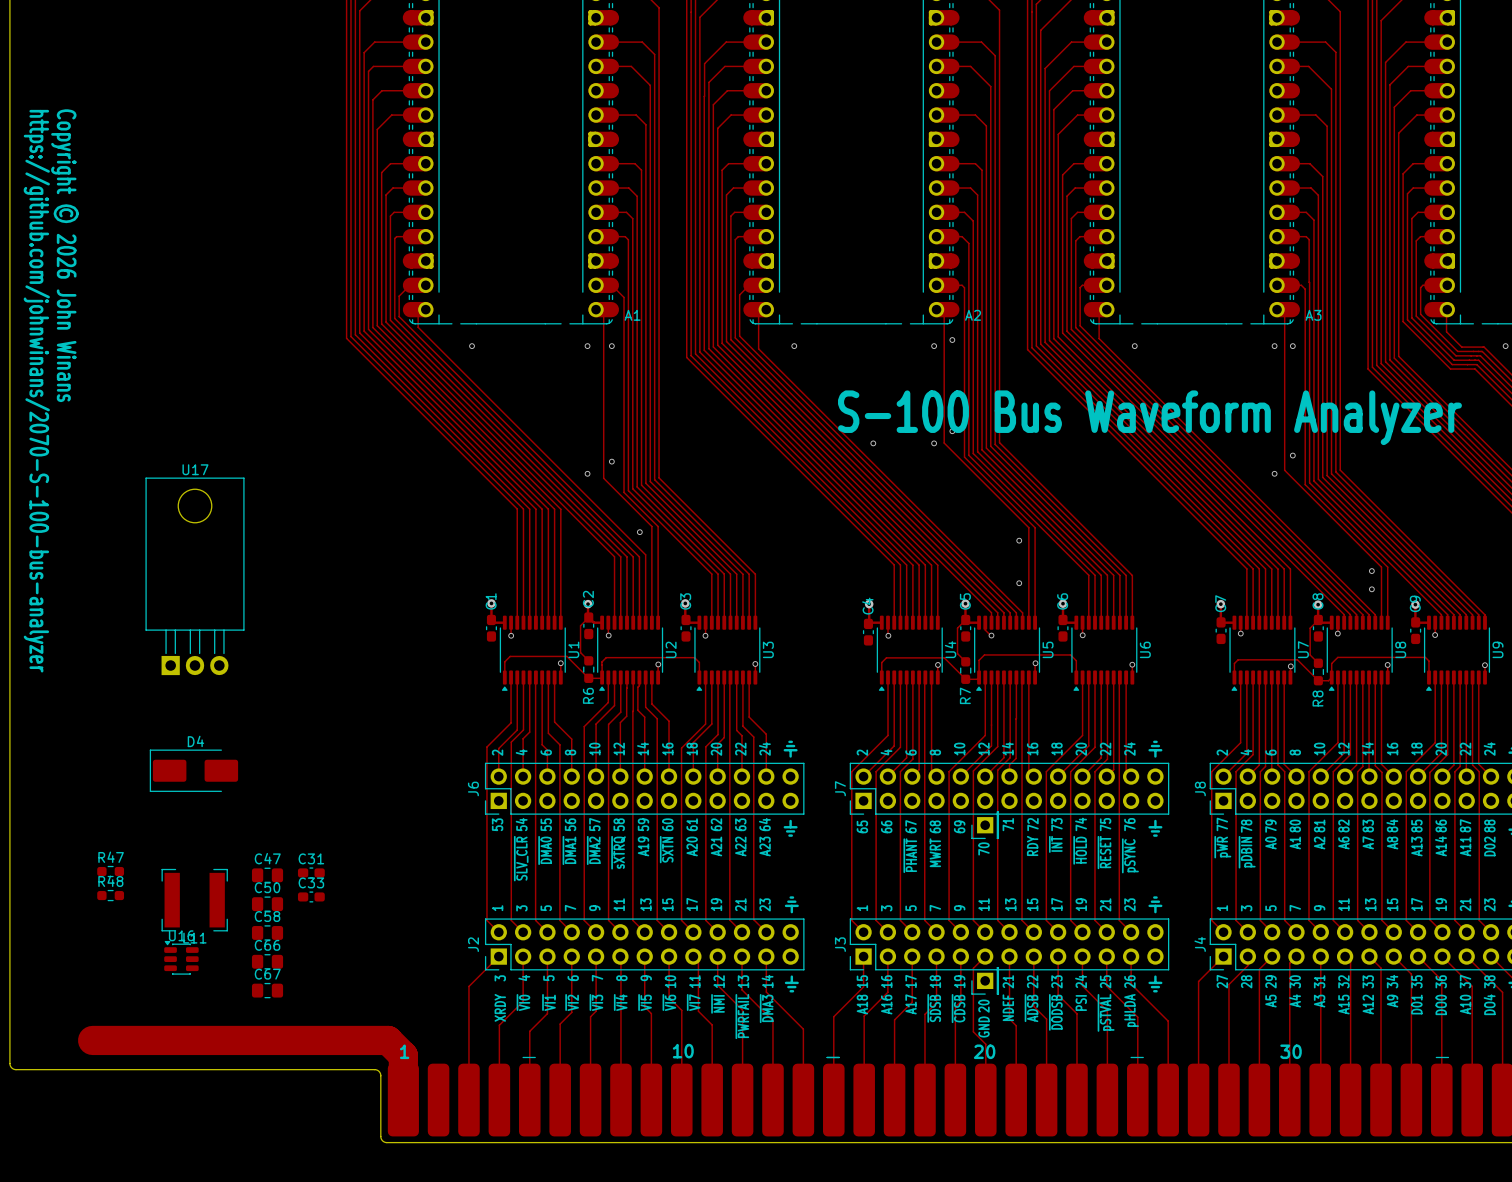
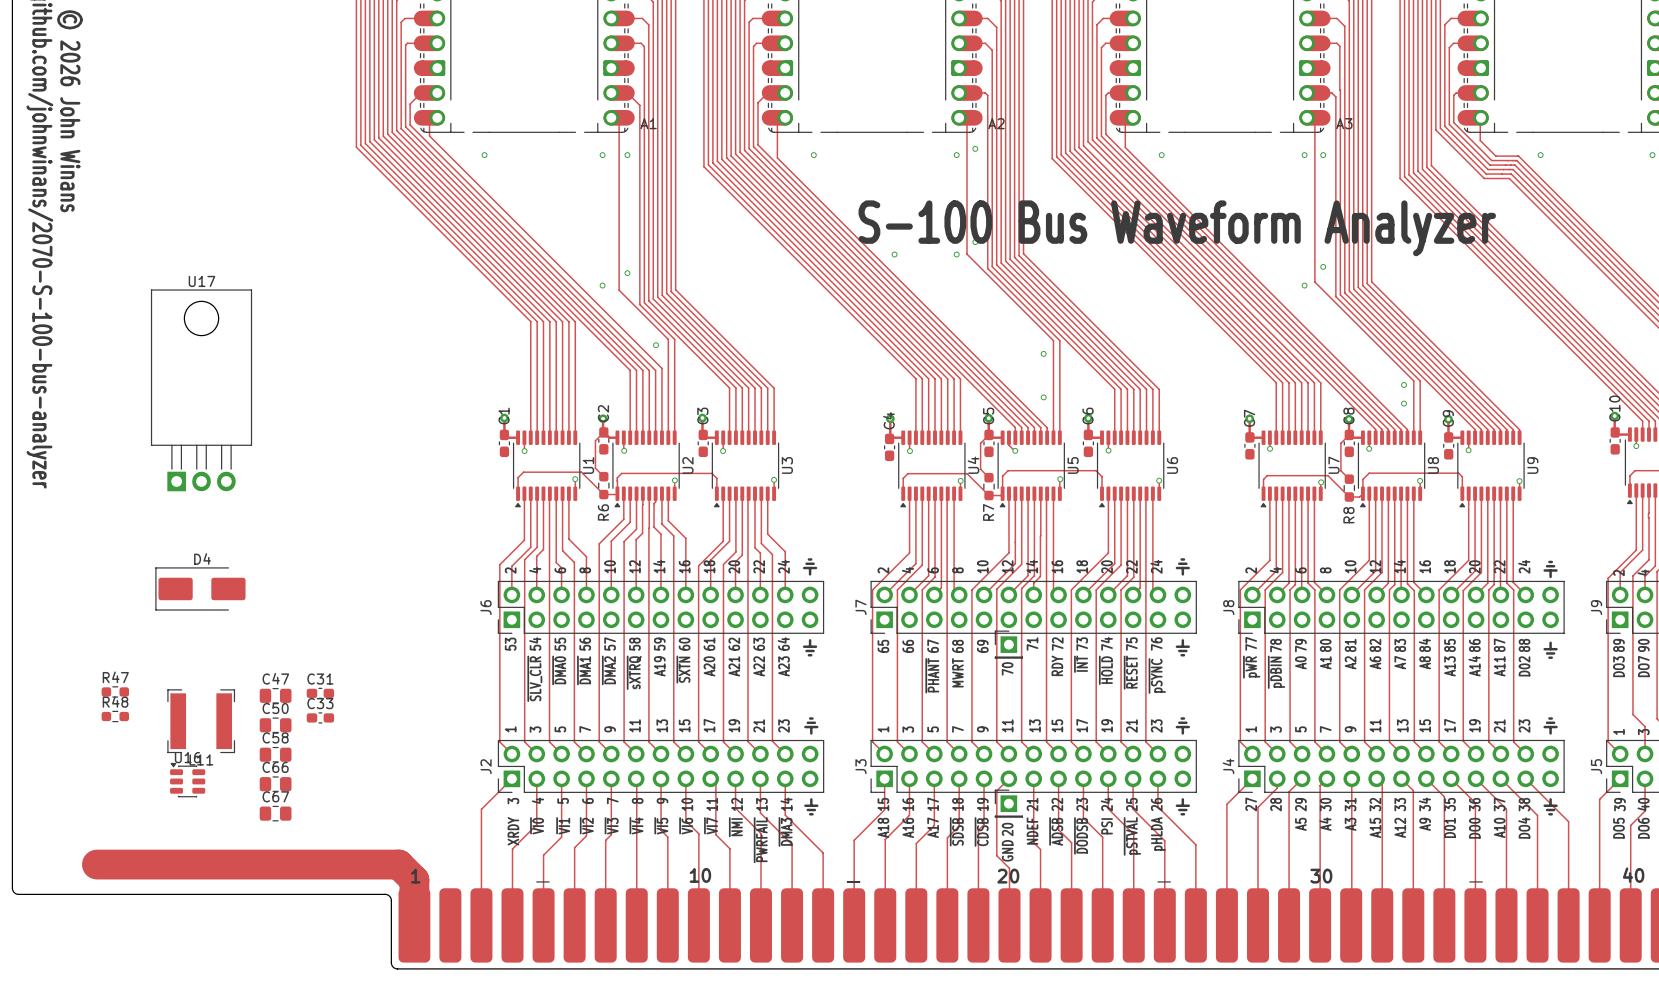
part rotation: 0° (985, 825) -> 90° clockwise (1008, 644)
part rotation: 0° (985, 980) -> 90° clockwise (1008, 803)

